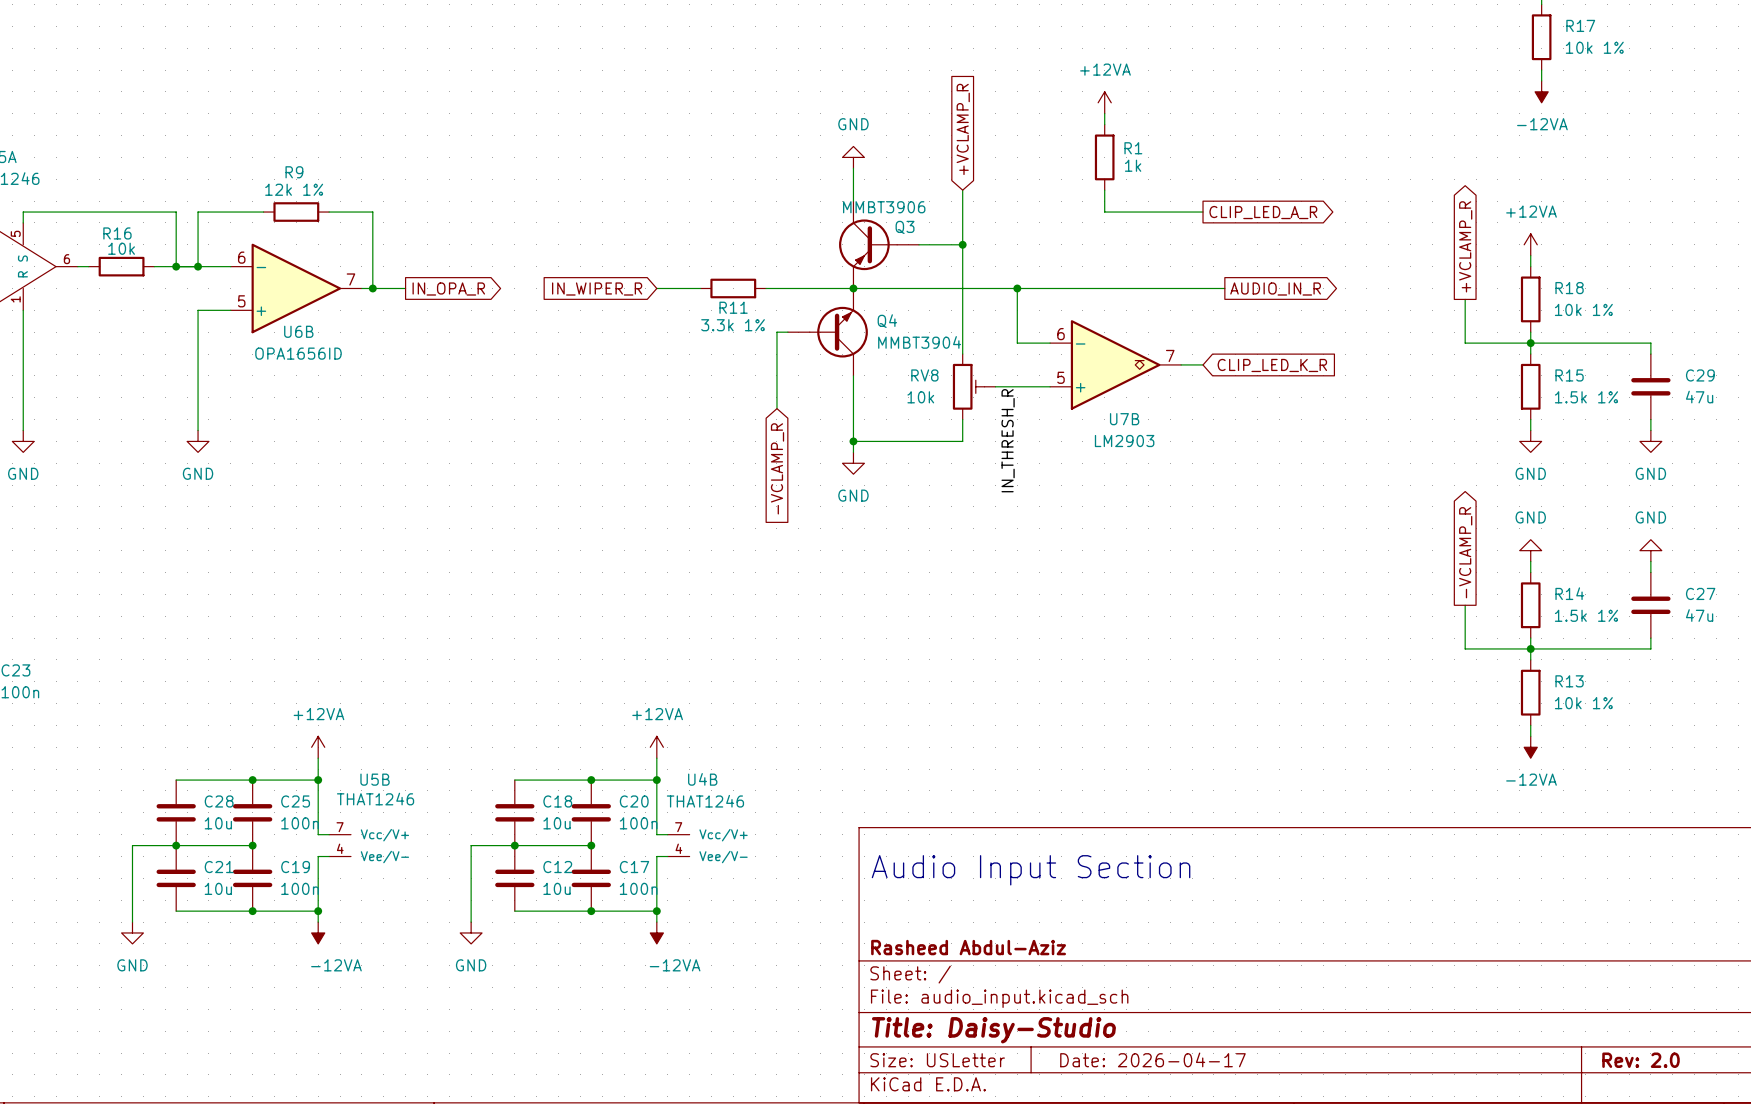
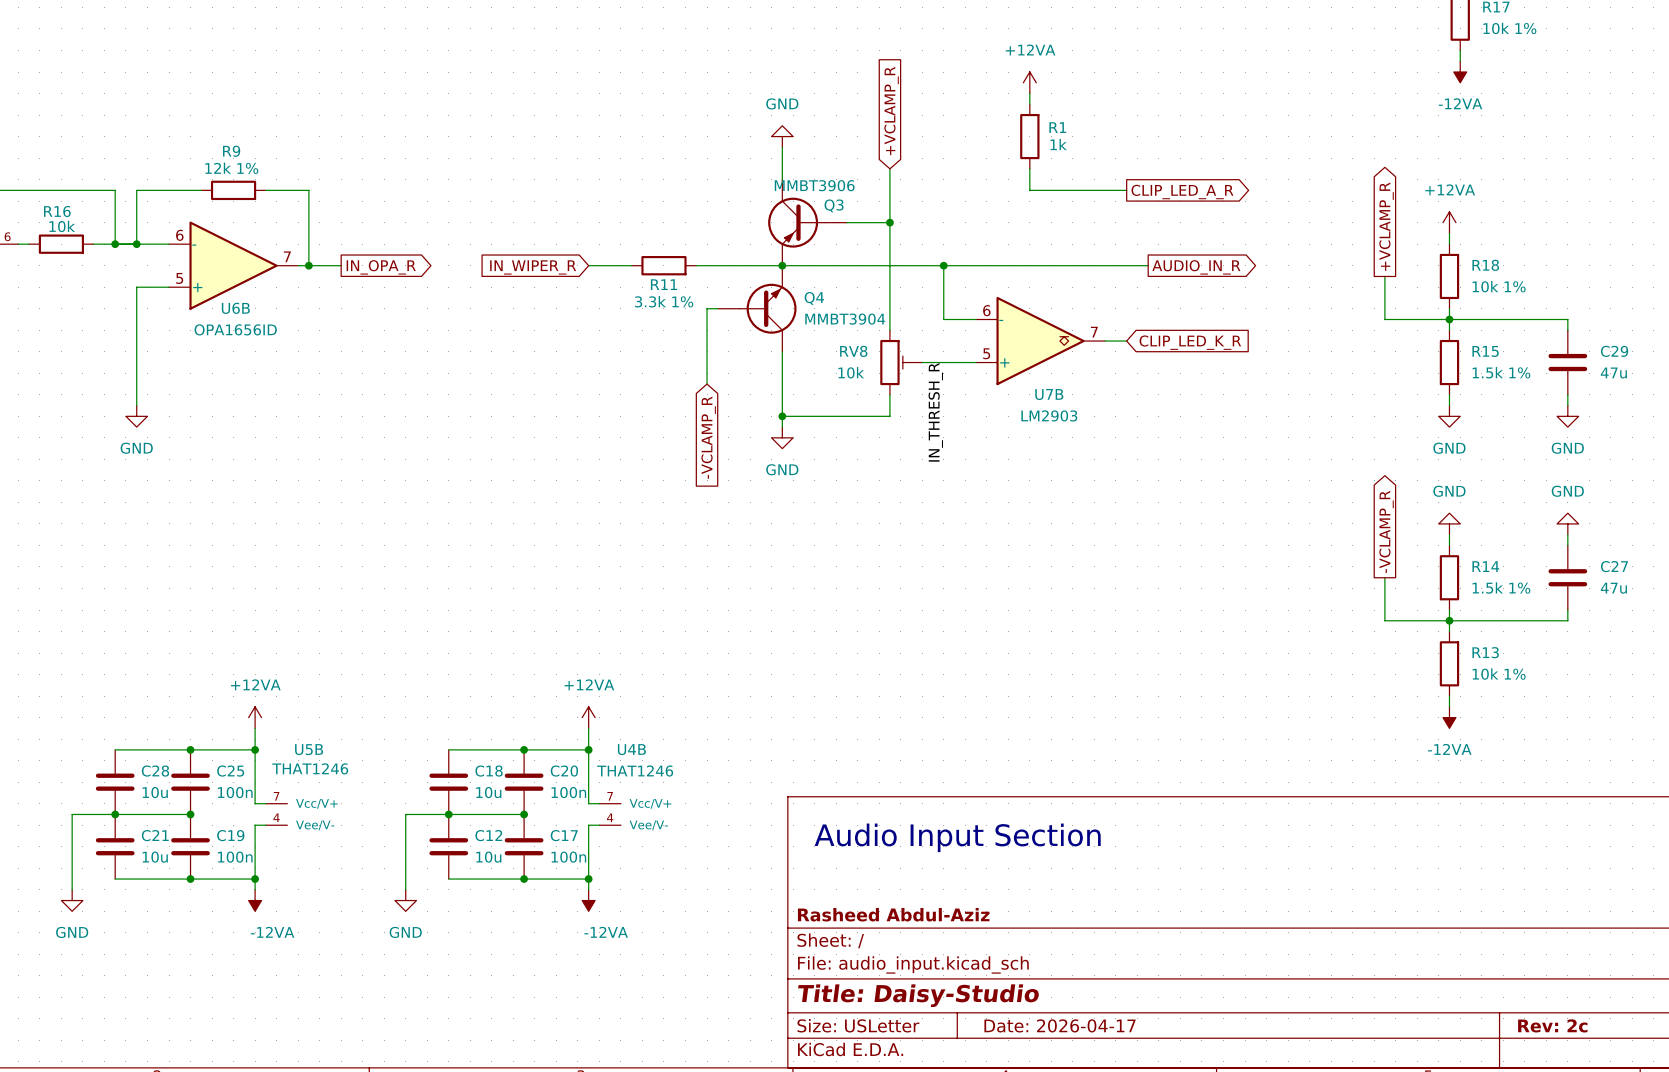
title block: Rev: 2.0 (1641, 1060) -> Rev: 2c (1552, 1025)

